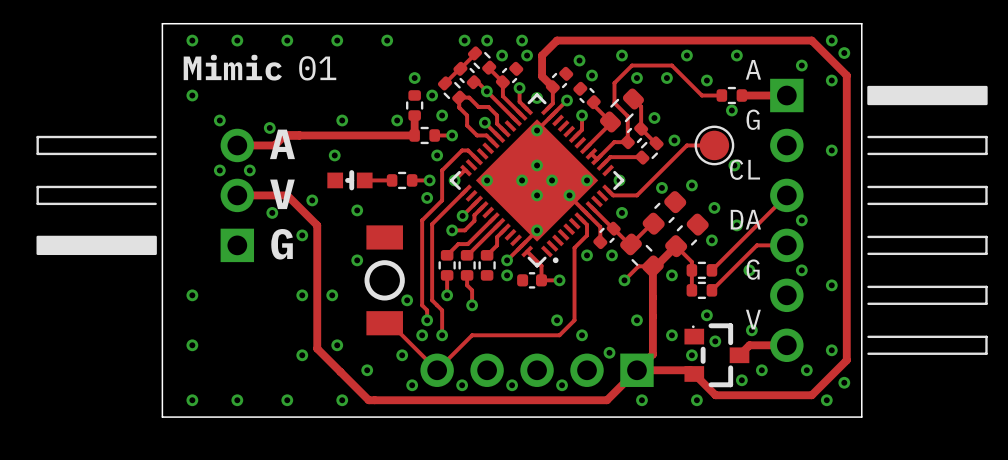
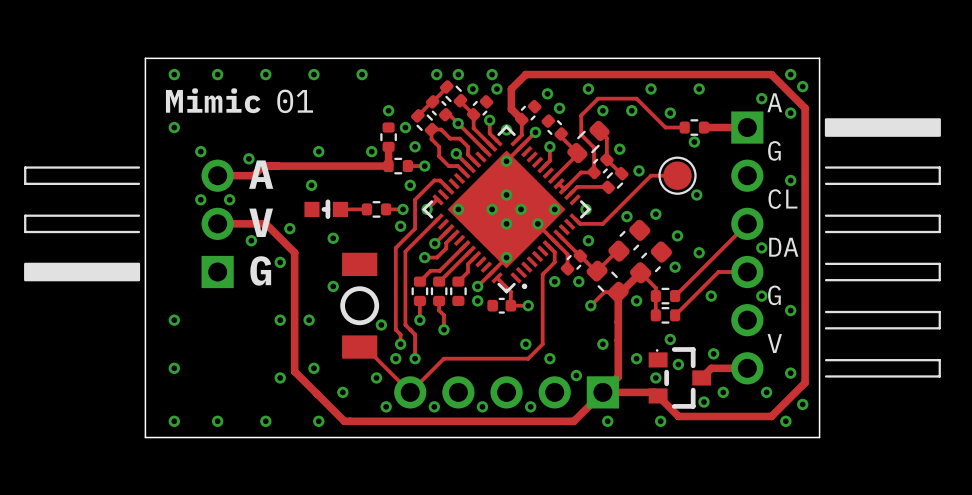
text position: A (753, 69) -> A (774, 102)
text position: G (753, 119) -> G (774, 150)
text position: CL (745, 169) -> CL (782, 199)
text position: DA (745, 219) -> DA (783, 247)
text position: G (753, 269) -> G (774, 295)
text position: V (753, 319) -> V (774, 343)

